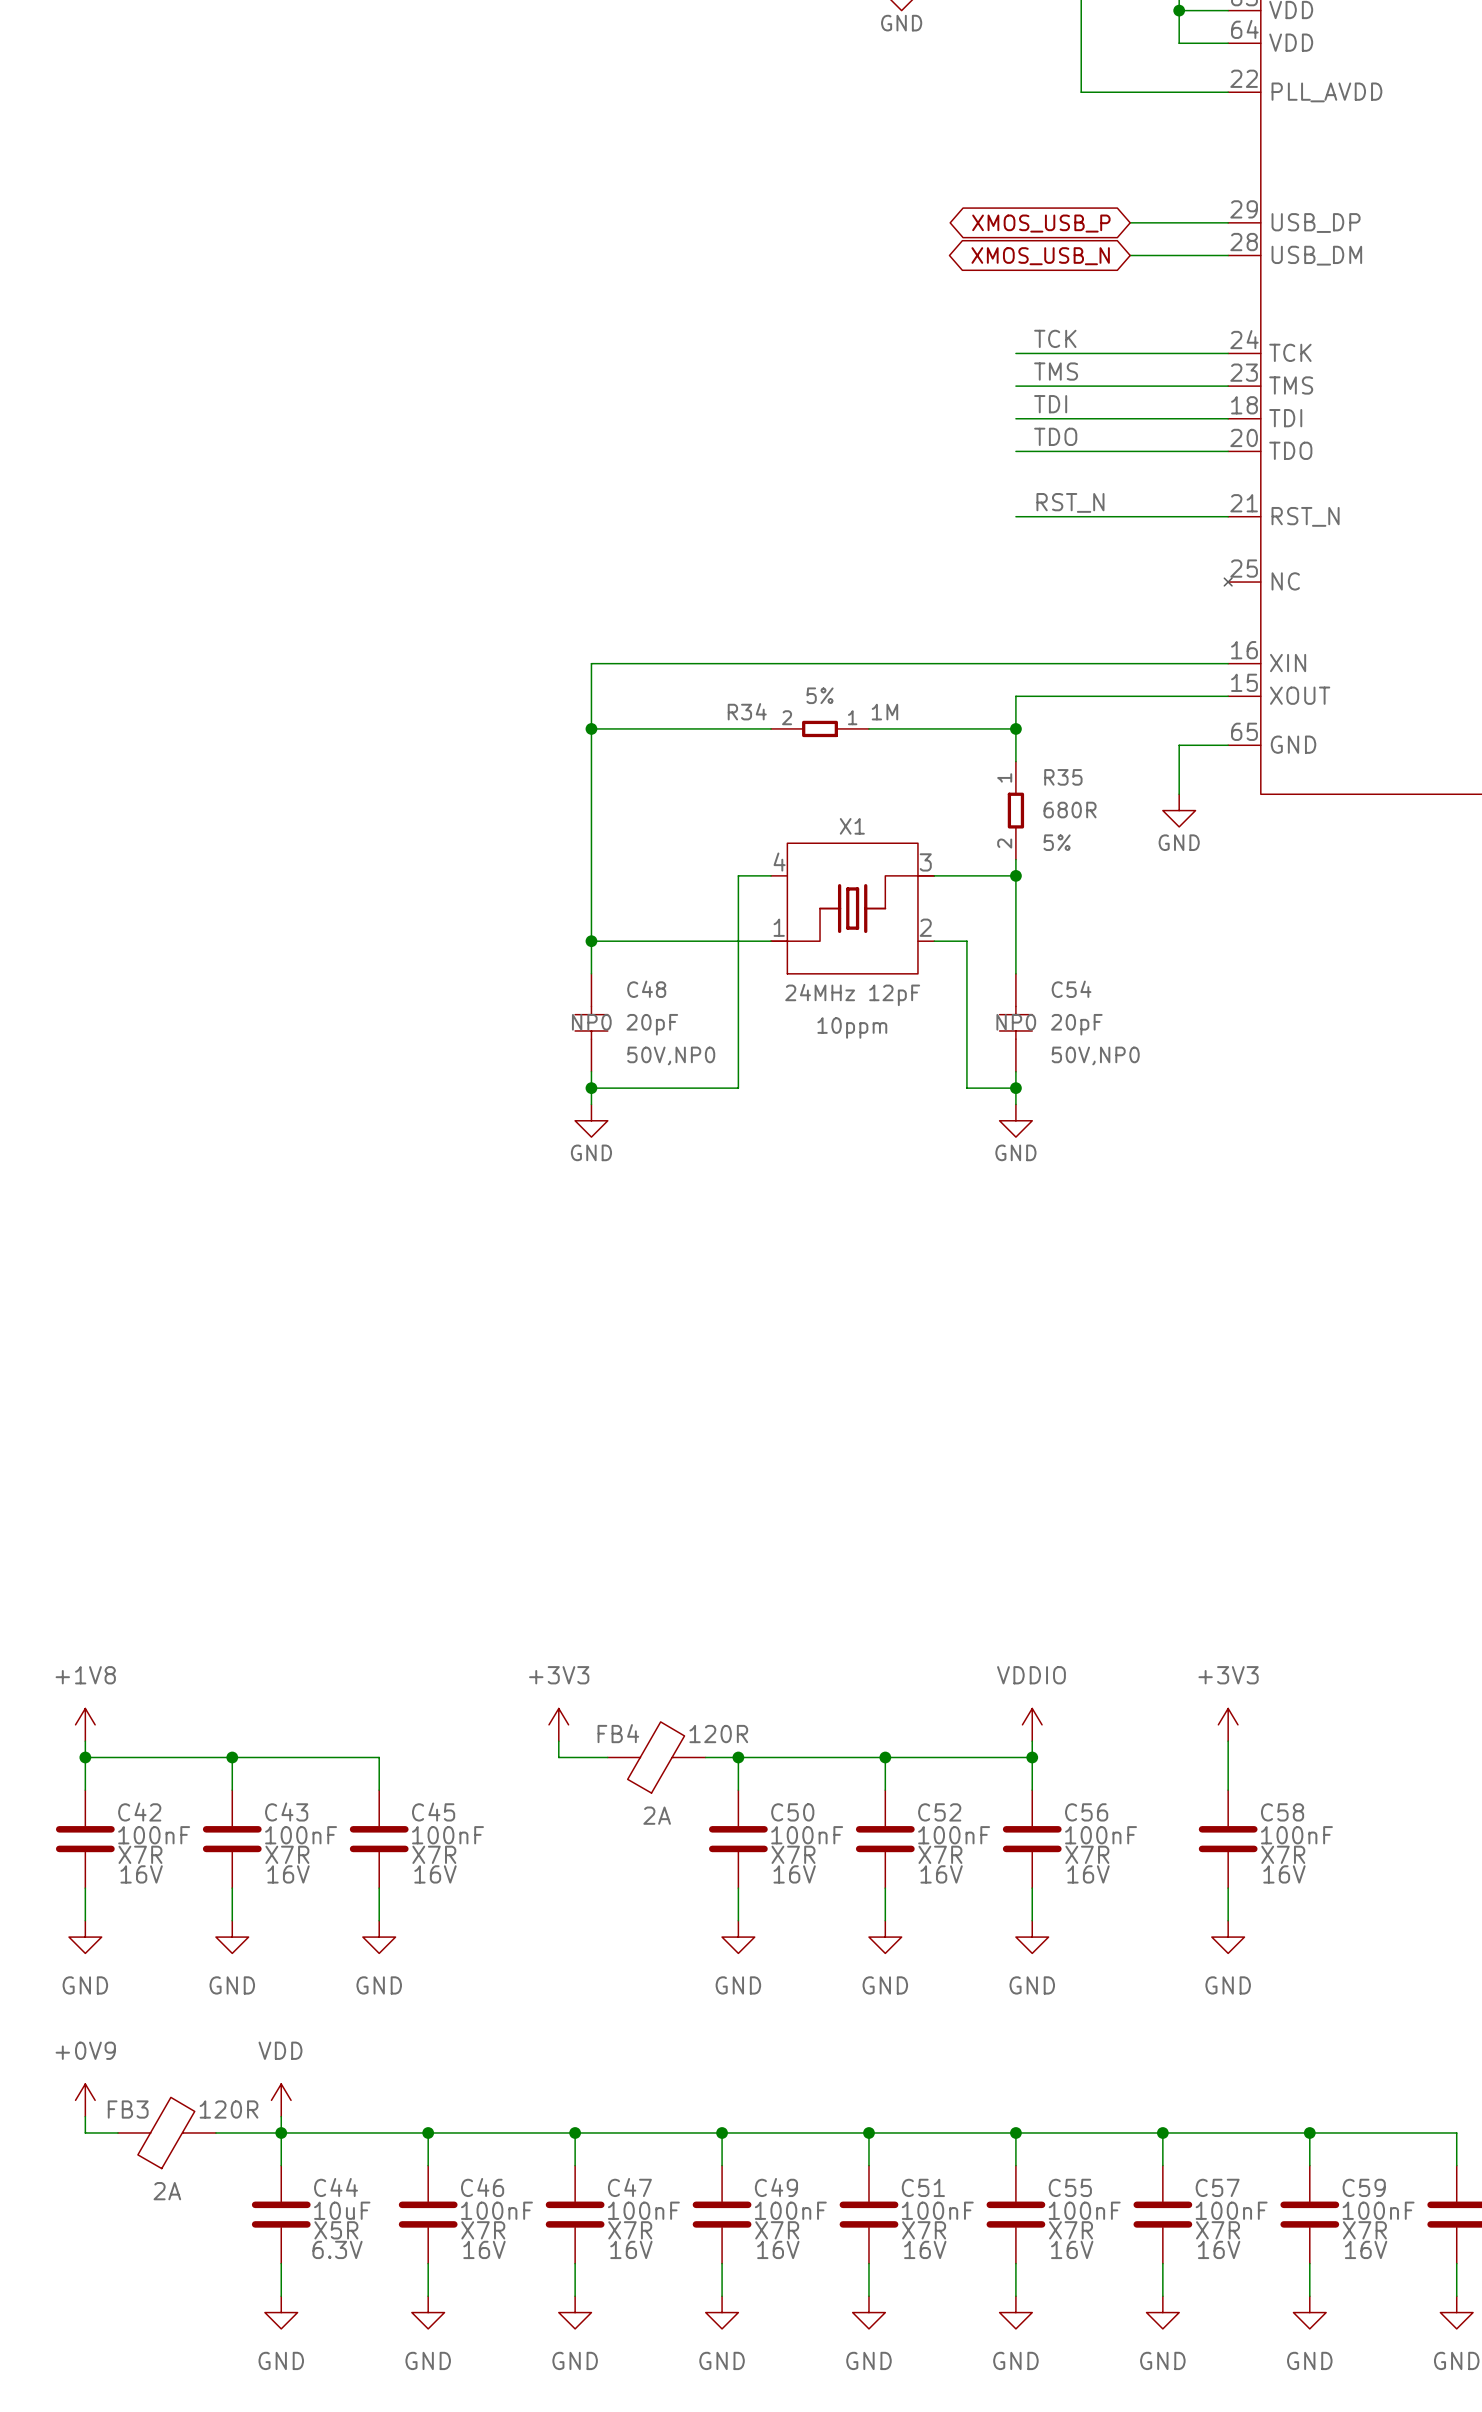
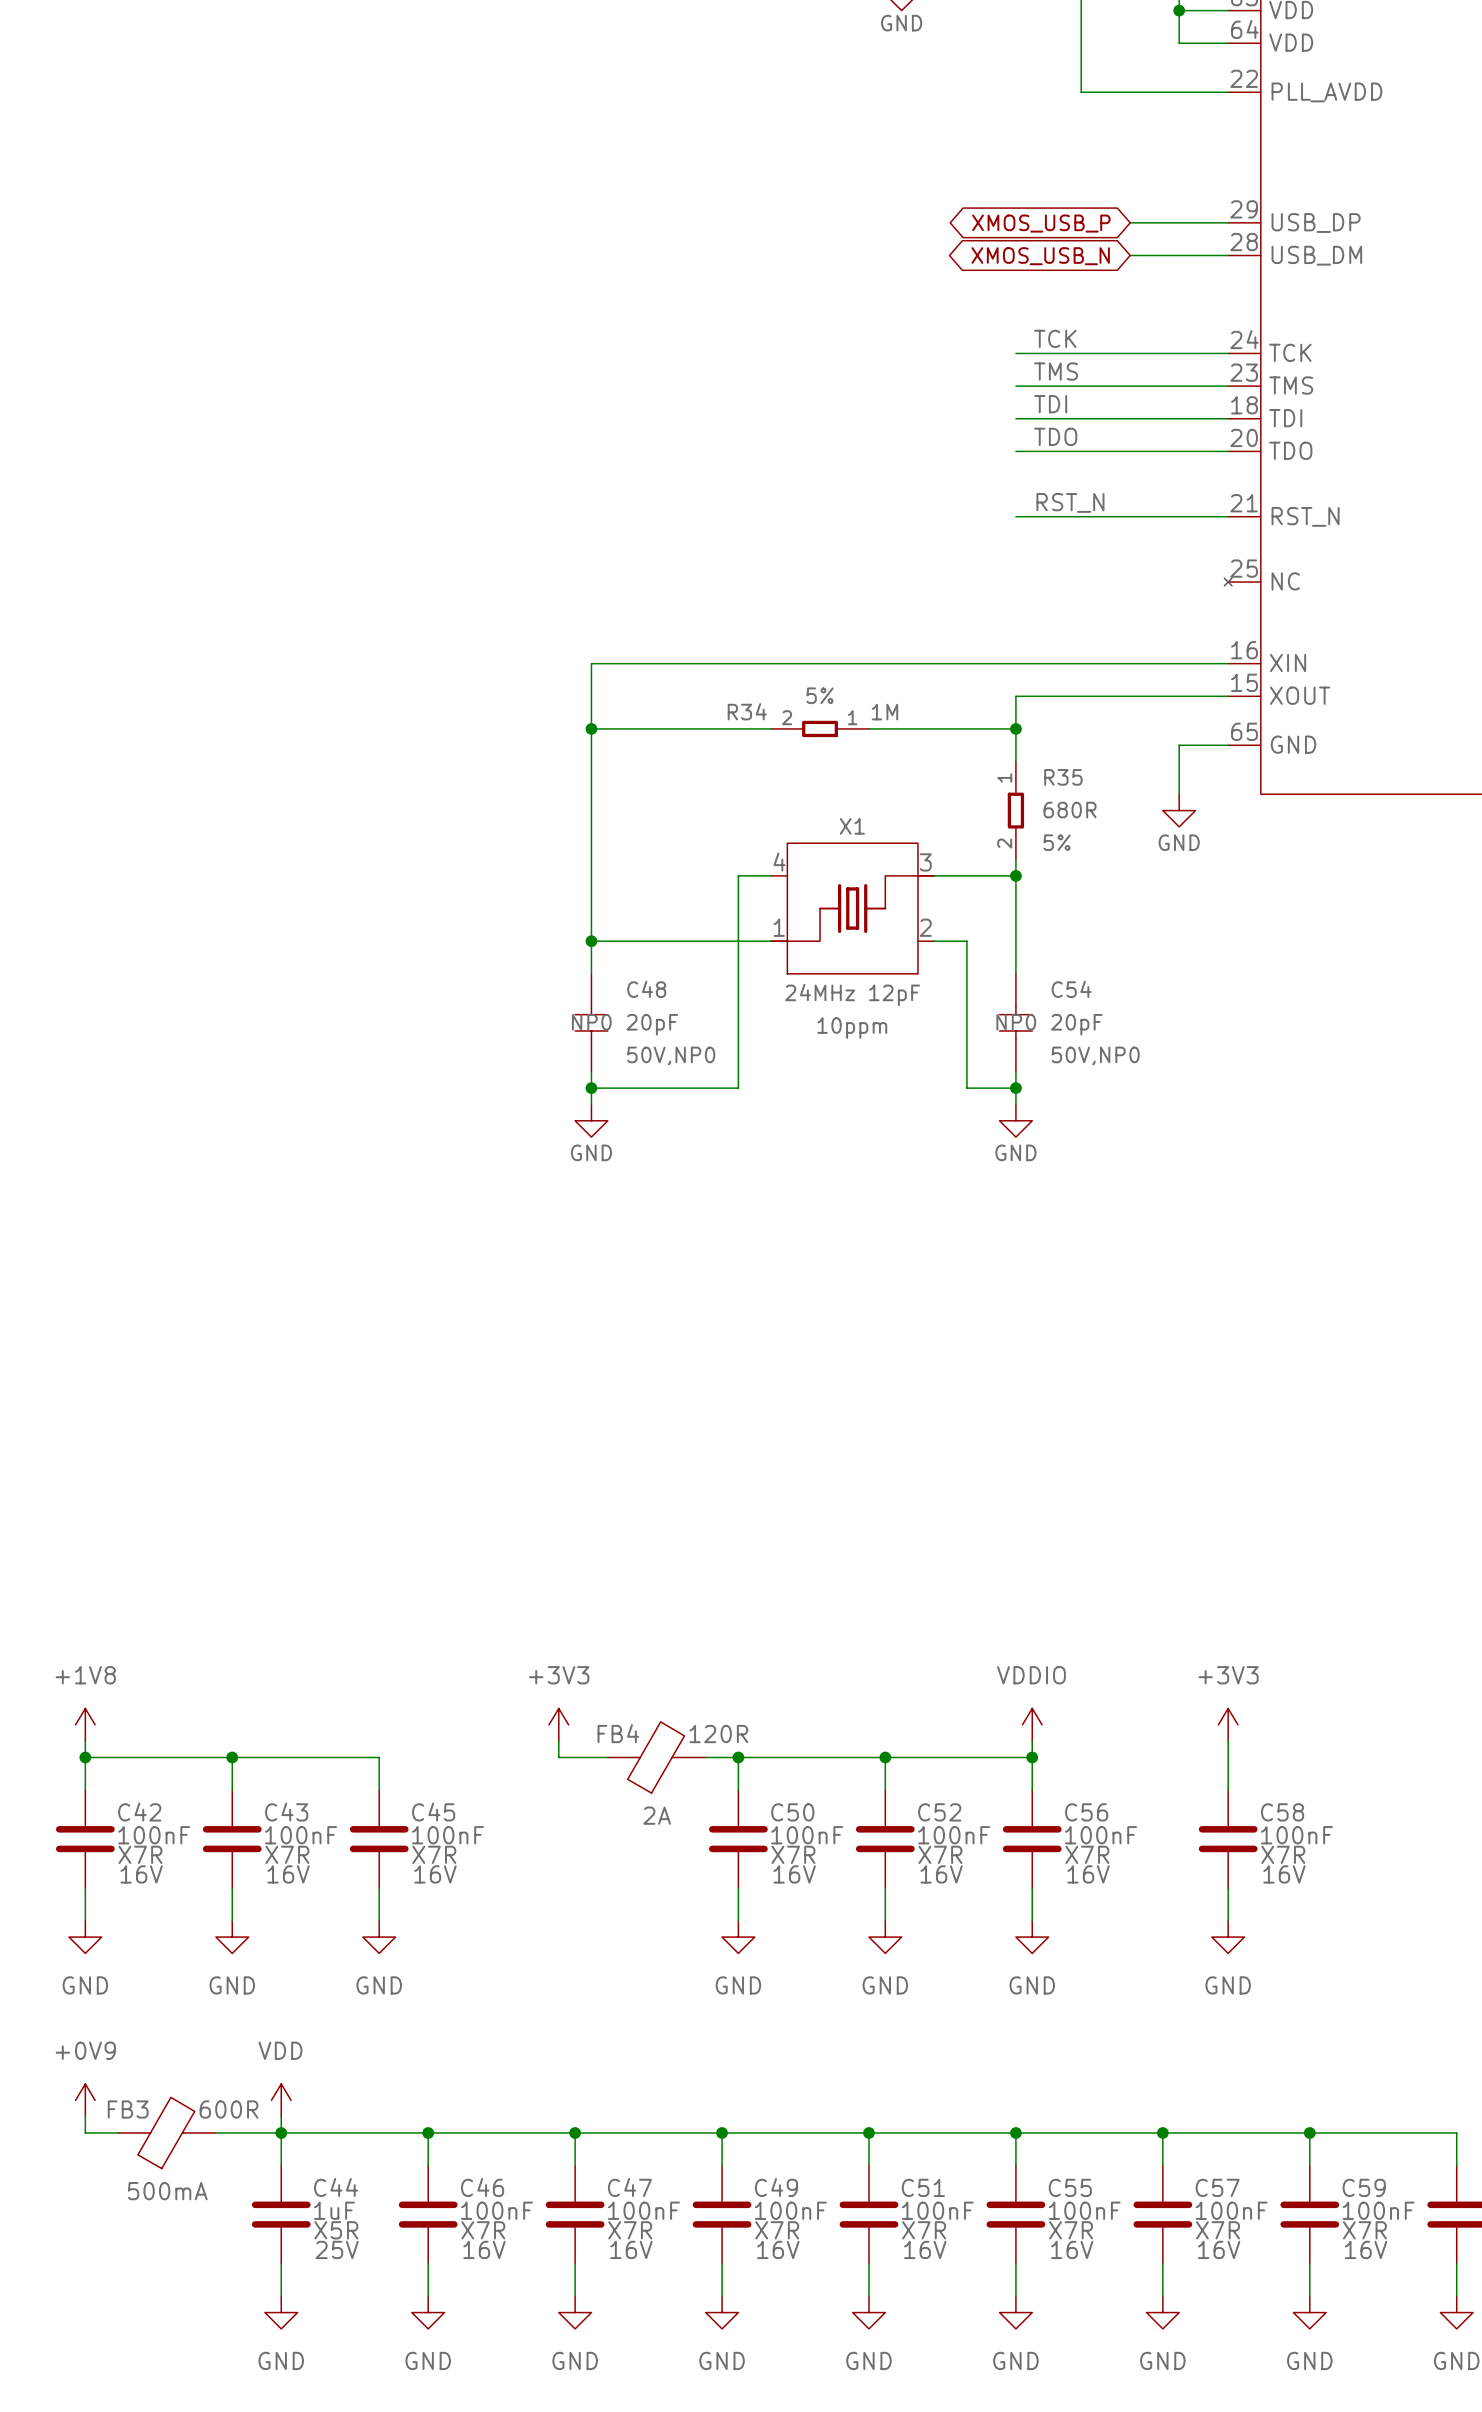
FB3 value: 120R (229, 2109) -> 600R (229, 2109)
FB3 text: 2A (167, 2191) -> 500mA (167, 2191)
C44 value: 10uF (342, 2210) -> 1uF (334, 2210)
C44 text: 6.3V (337, 2249) -> 25V (337, 2249)

